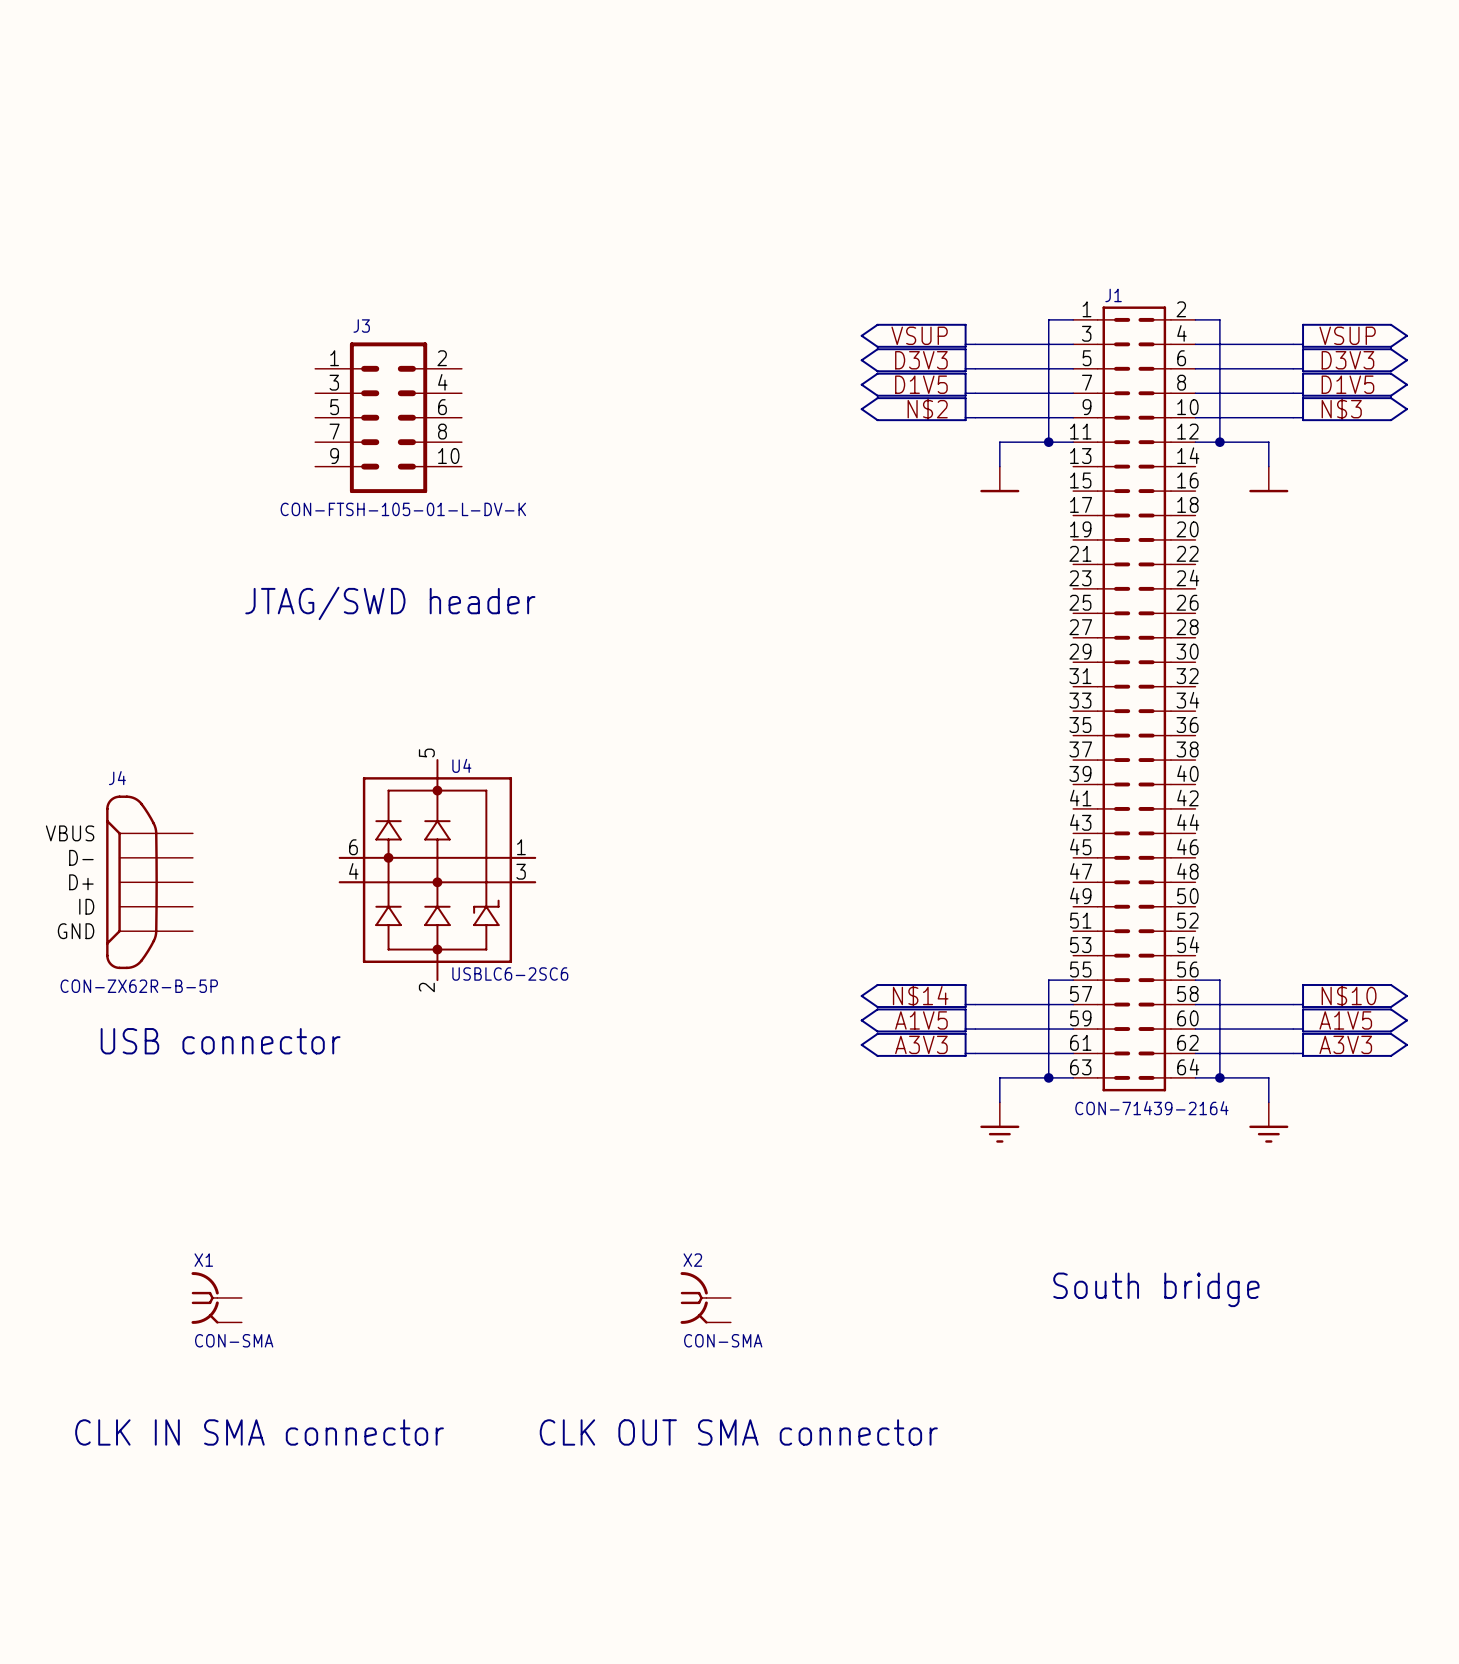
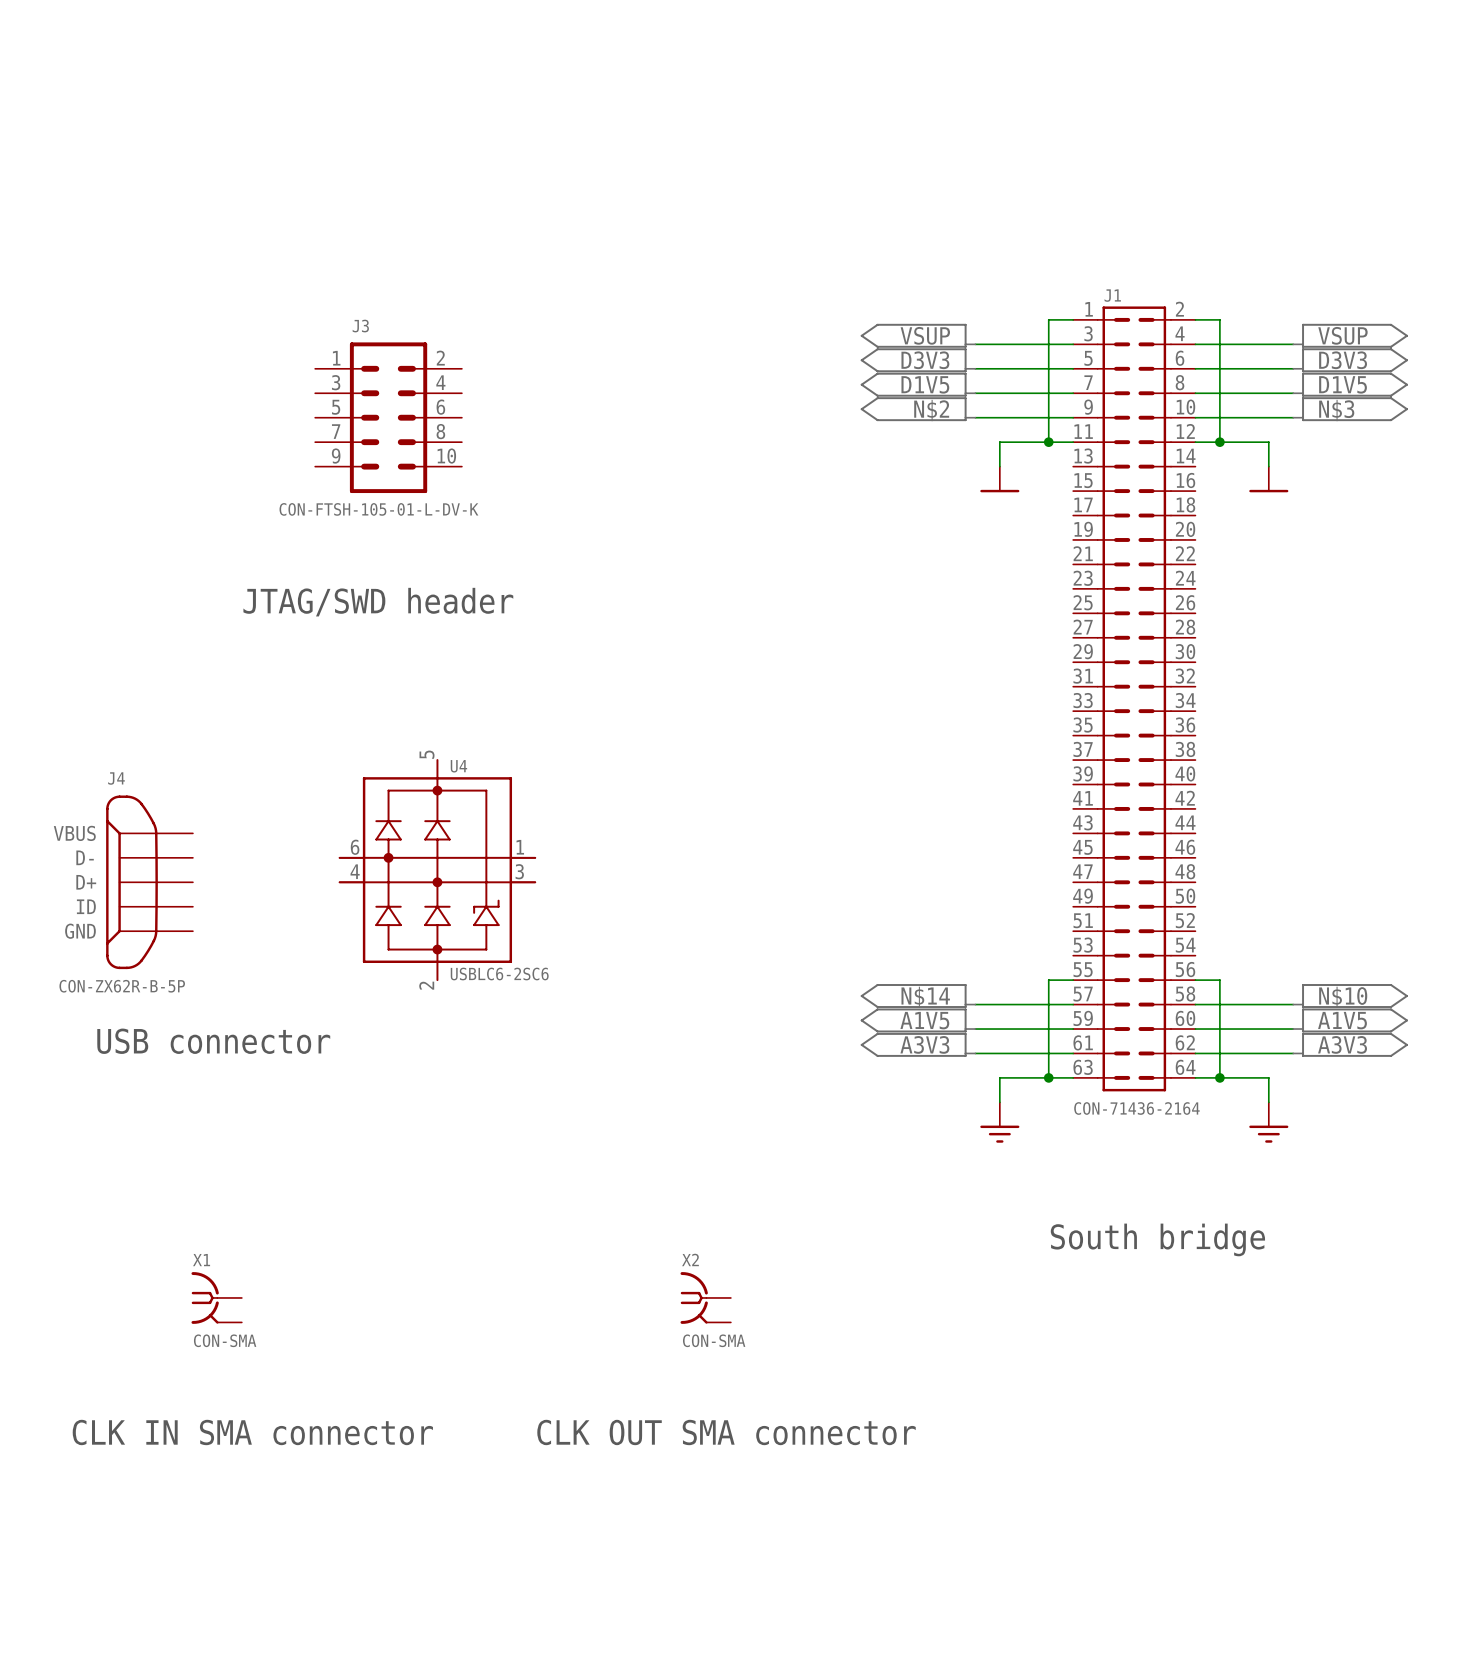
J1 value: CON-71439-2164 (1151, 1108) -> CON-71436-2164 (1136, 1108)
text position: South bridge (1156, 1289) -> South bridge (1157, 1239)

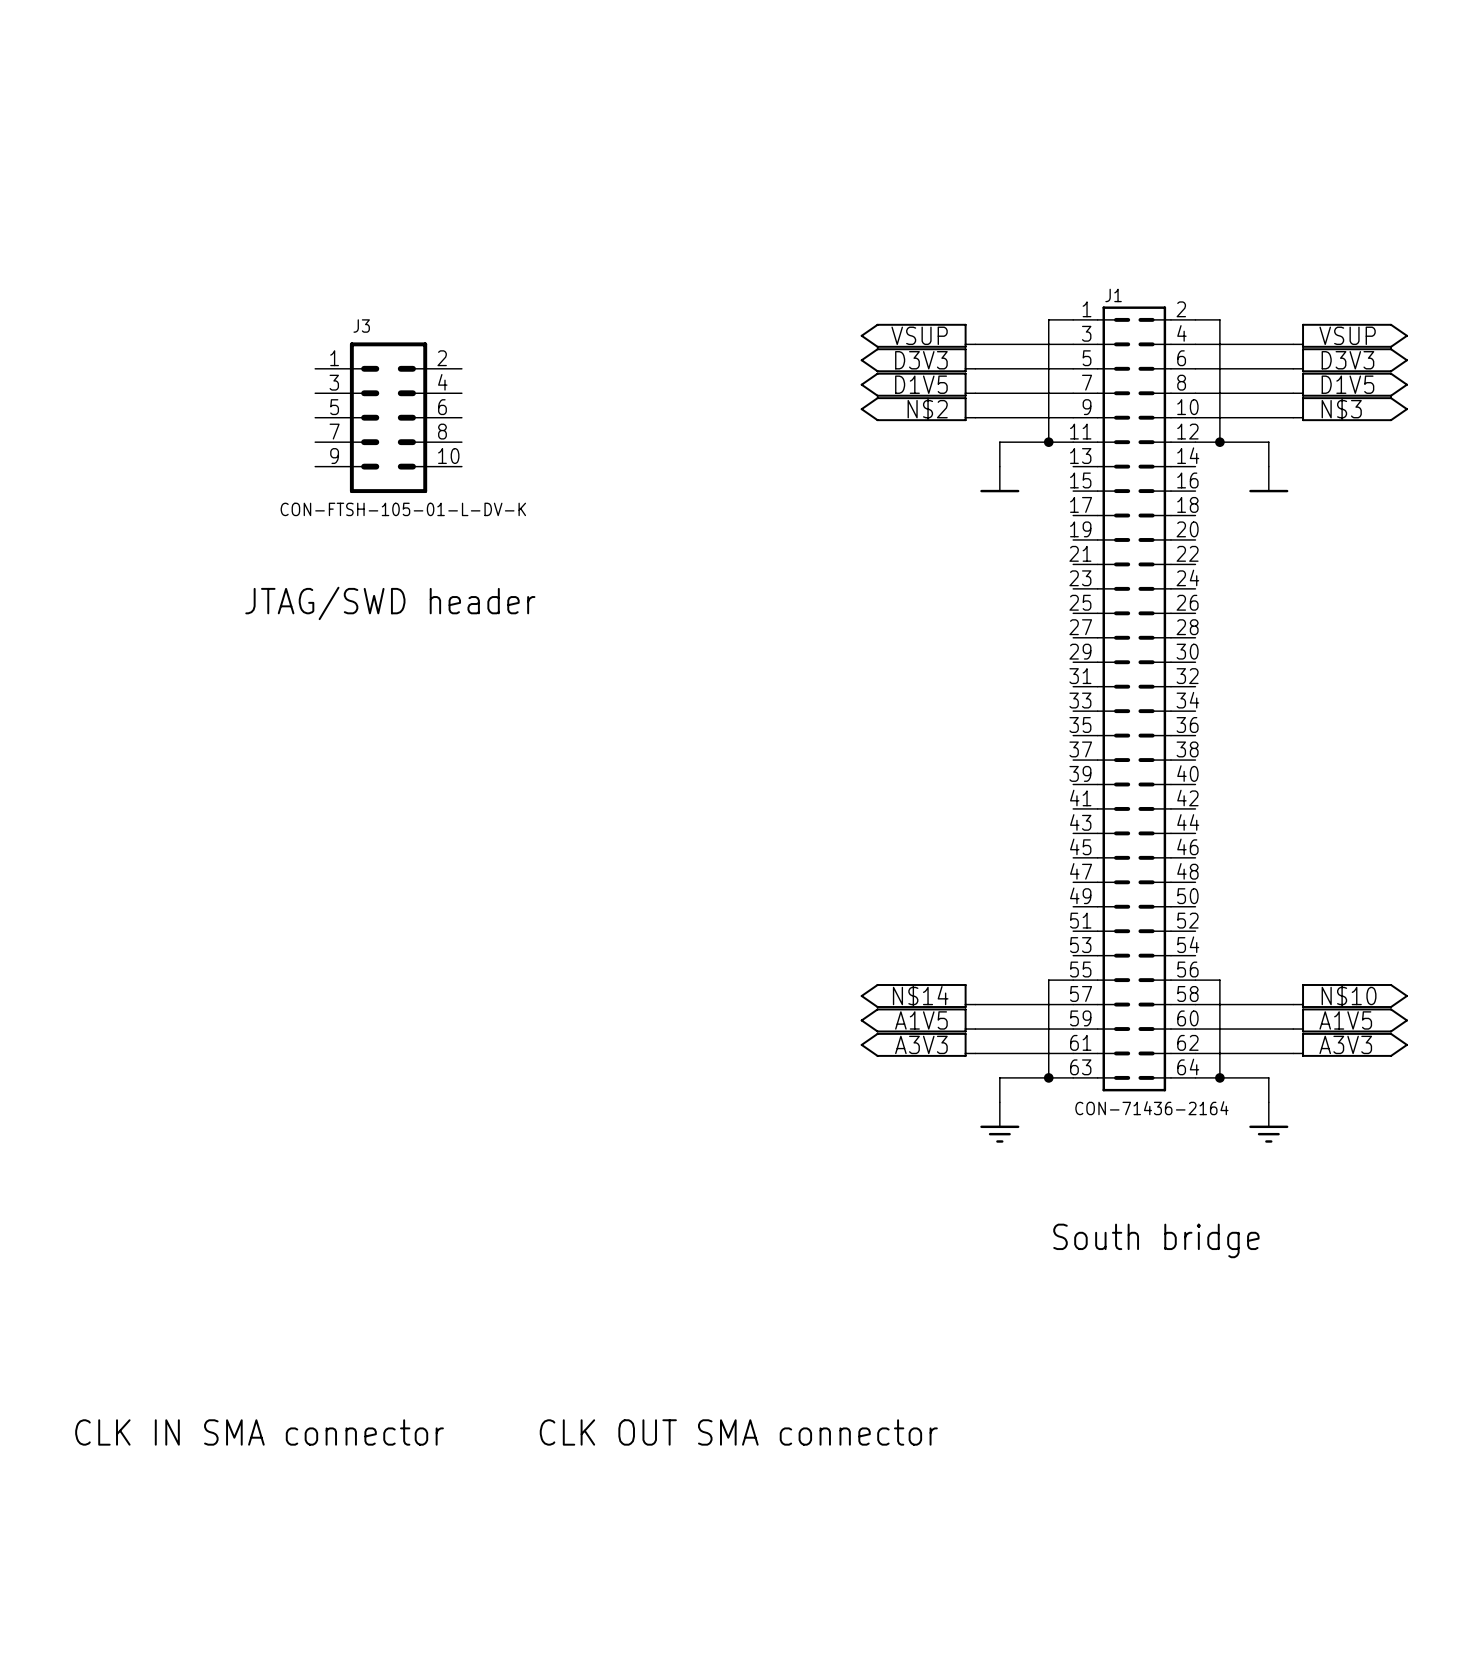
U4: USBLC6-2SC6 (437, 870) -> none
J4: CON-ZX62R-B-5P (149, 882) -> none
text: USB connector (213, 1041) -> none
X1: CON-SMA (216, 1297) -> none
X2: CON-SMA (705, 1297) -> none

